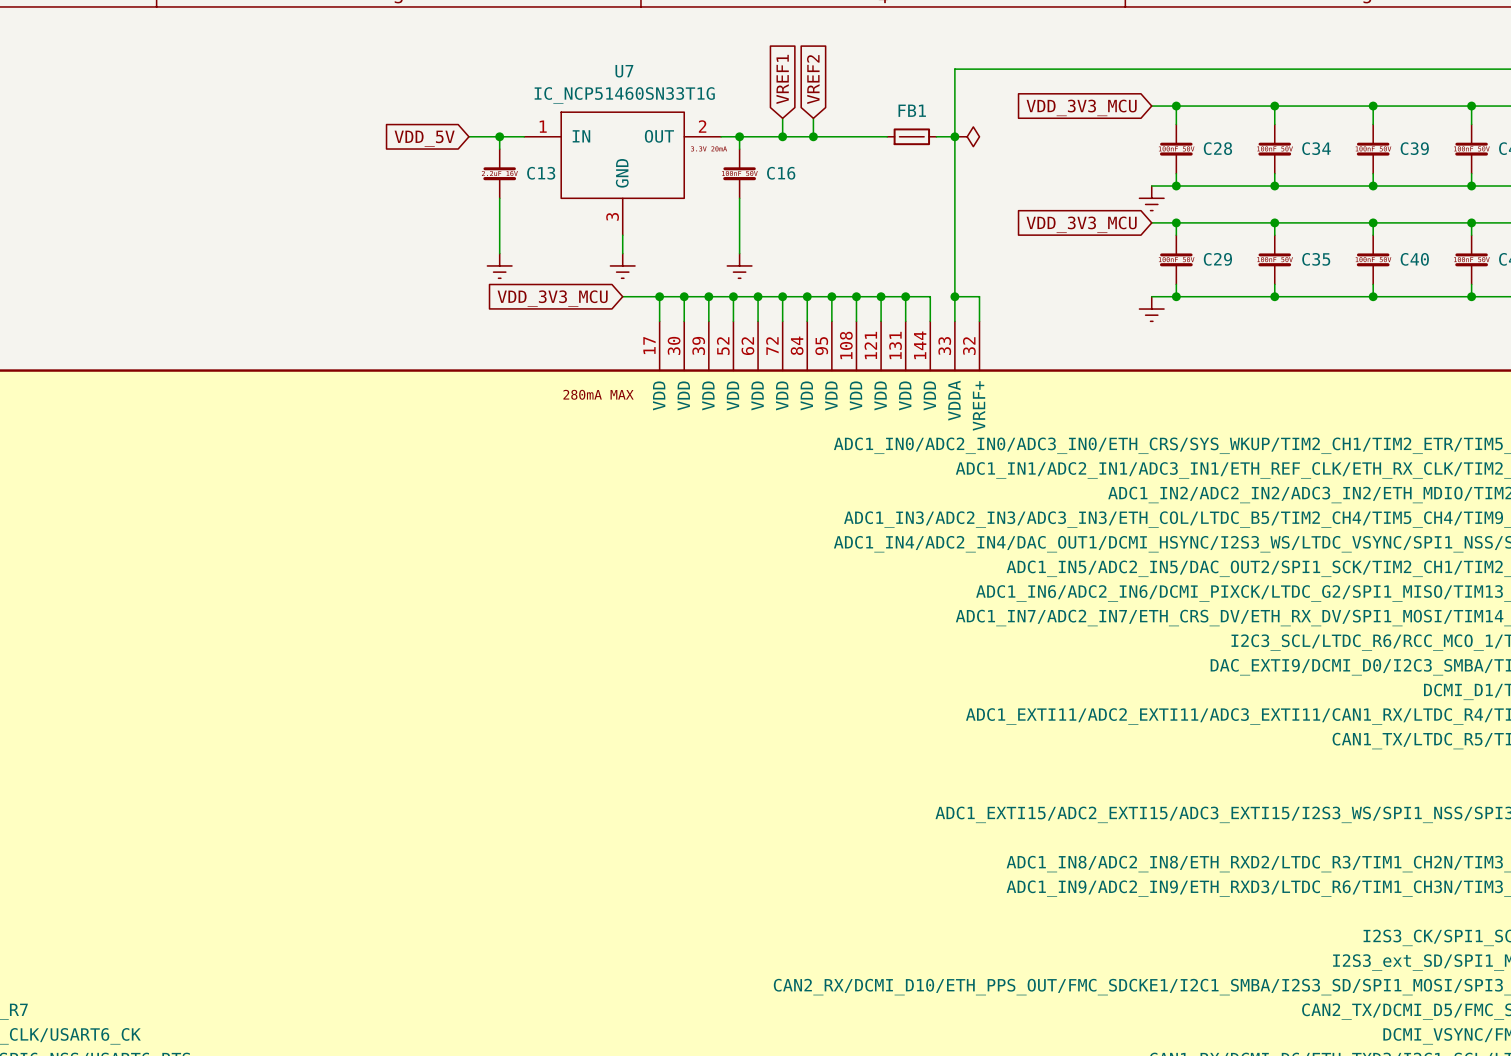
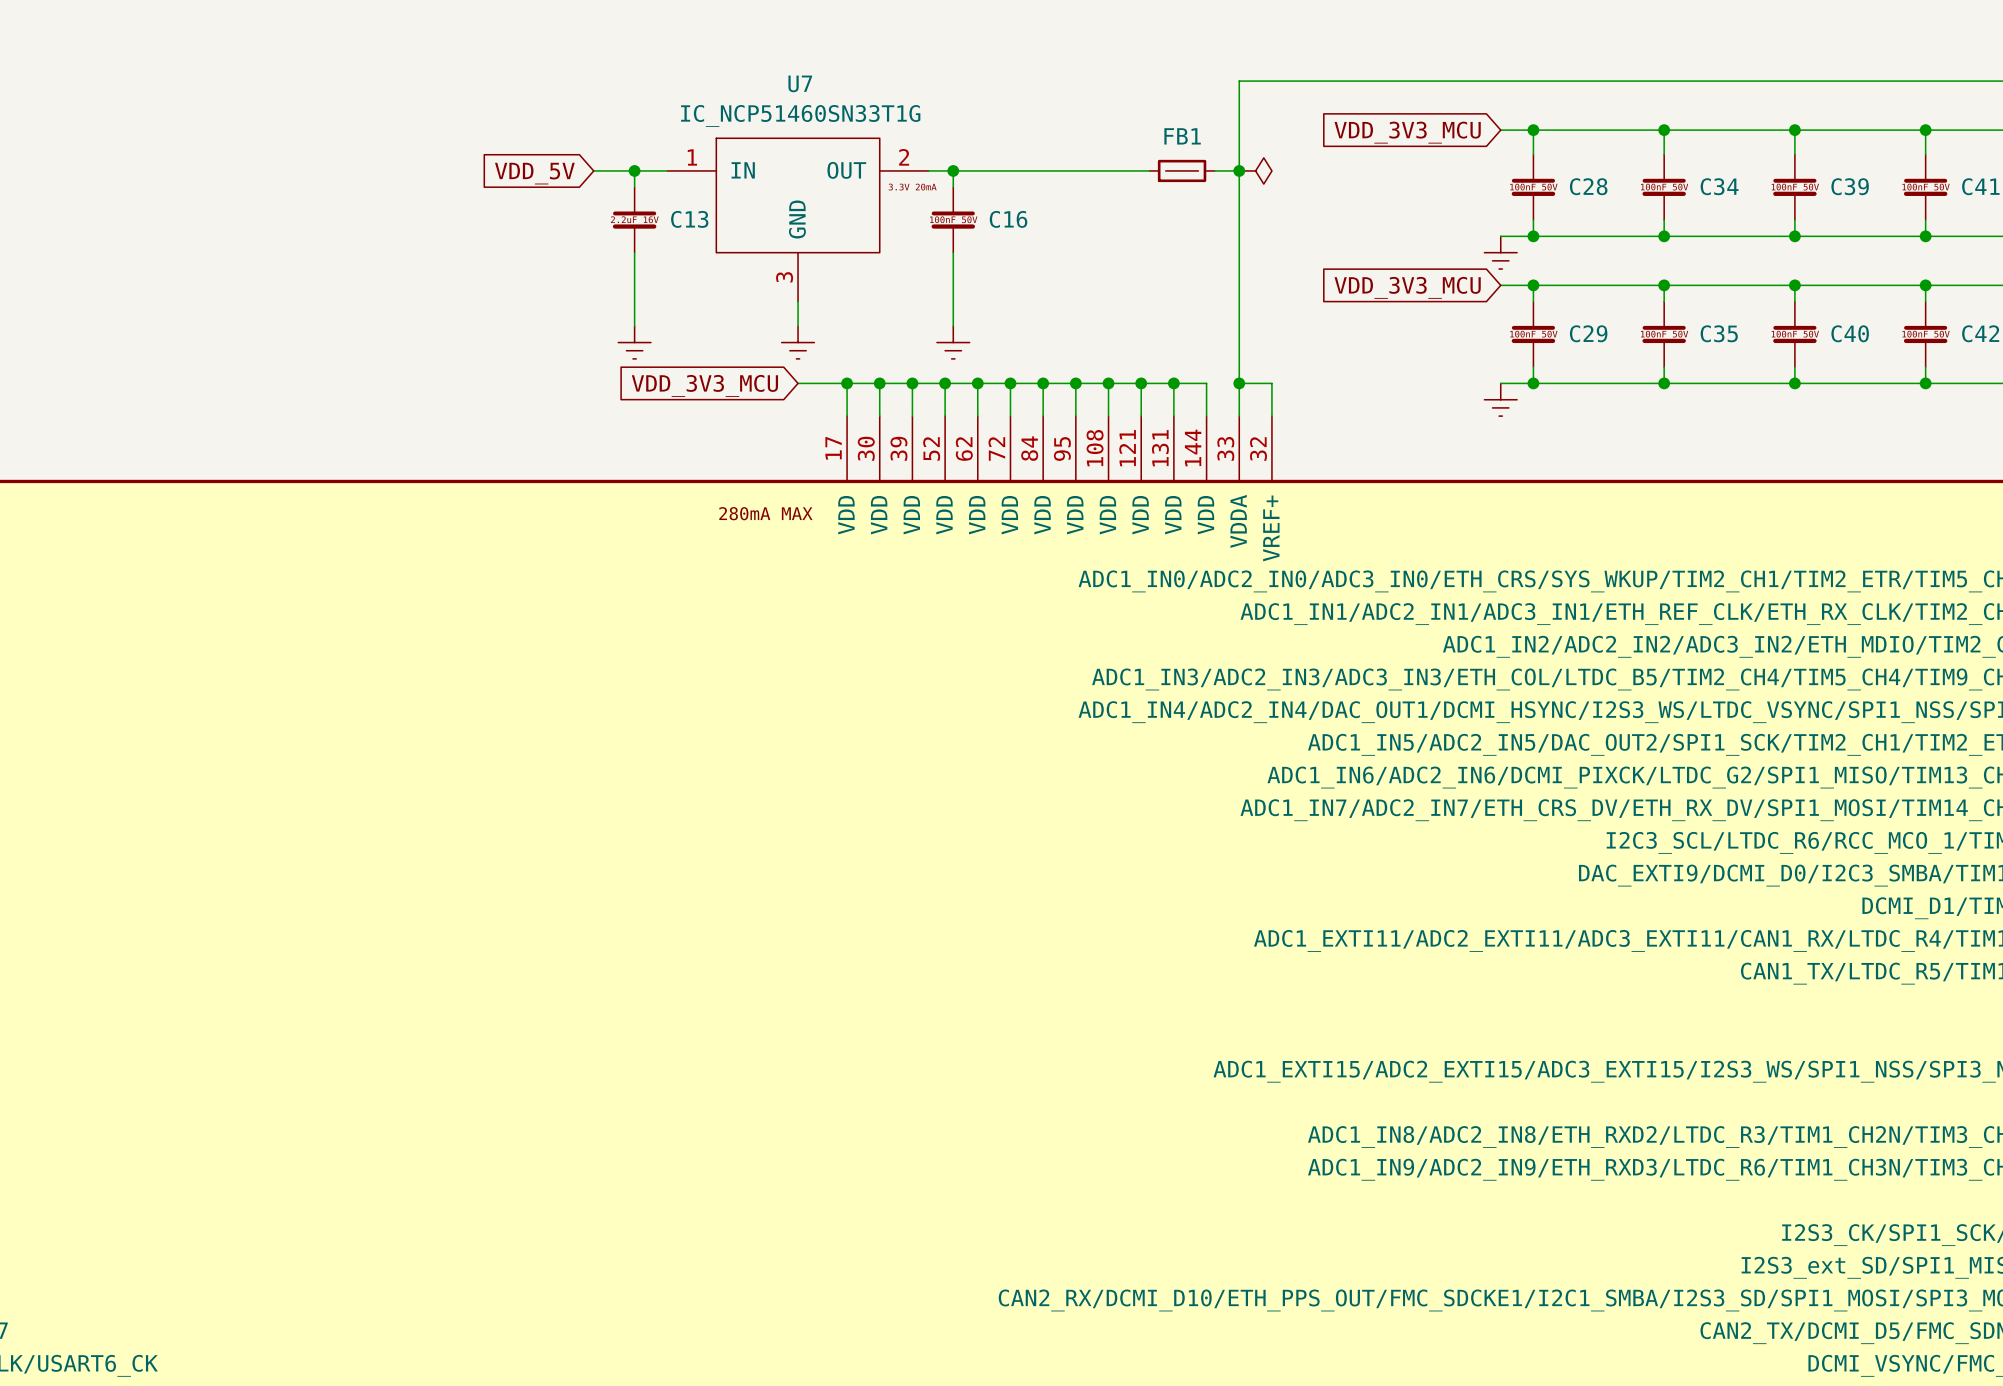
global label: VREF1 (782, 79) -> none
global label: VREF2 (813, 79) -> none
wire: (782, 118) (782, 136) -> none
wire: (813, 118) (813, 136) -> none
junction: (782, 136) -> none
junction: (813, 136) -> none

